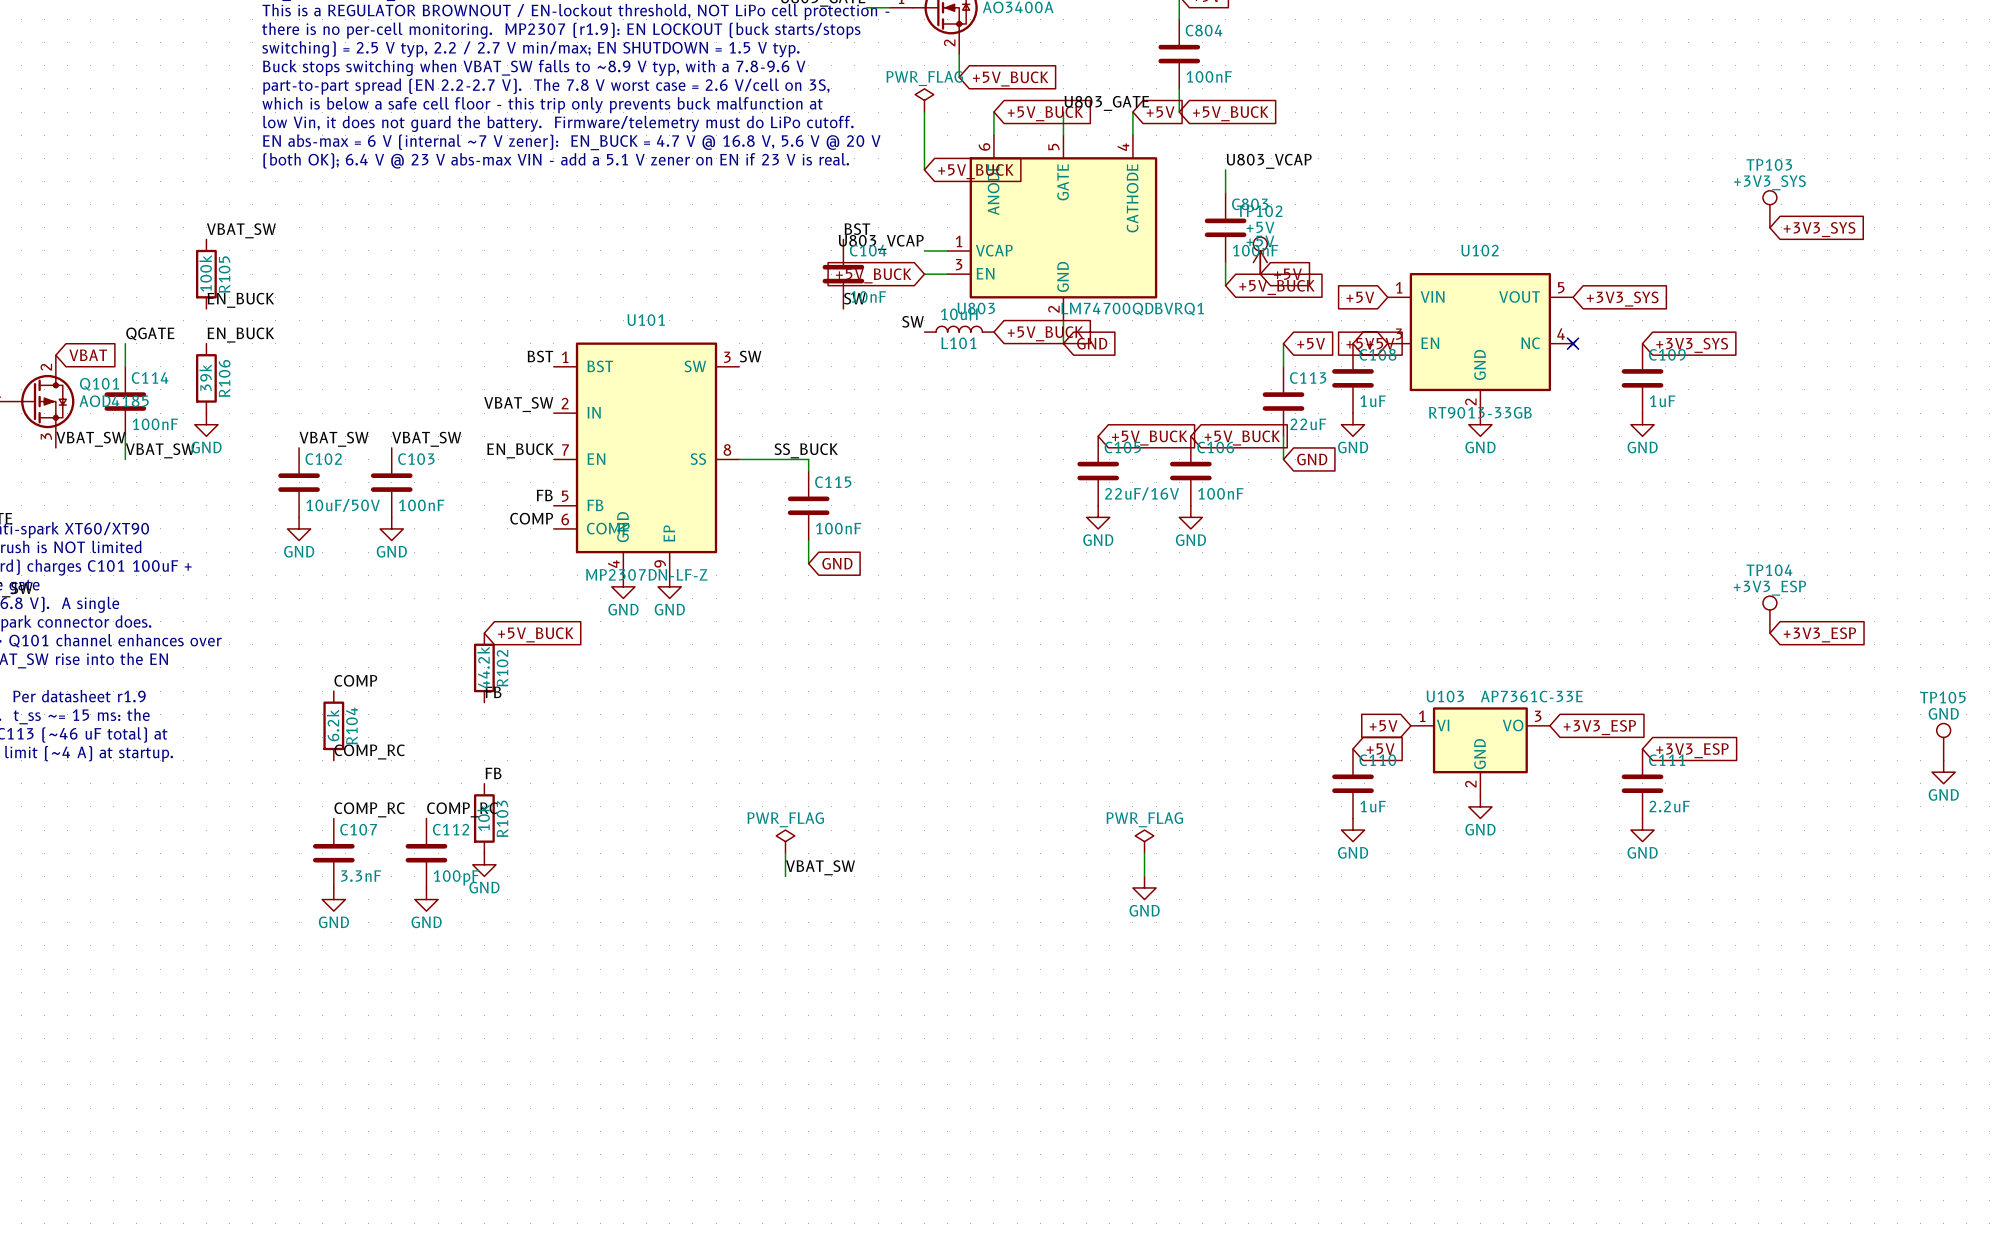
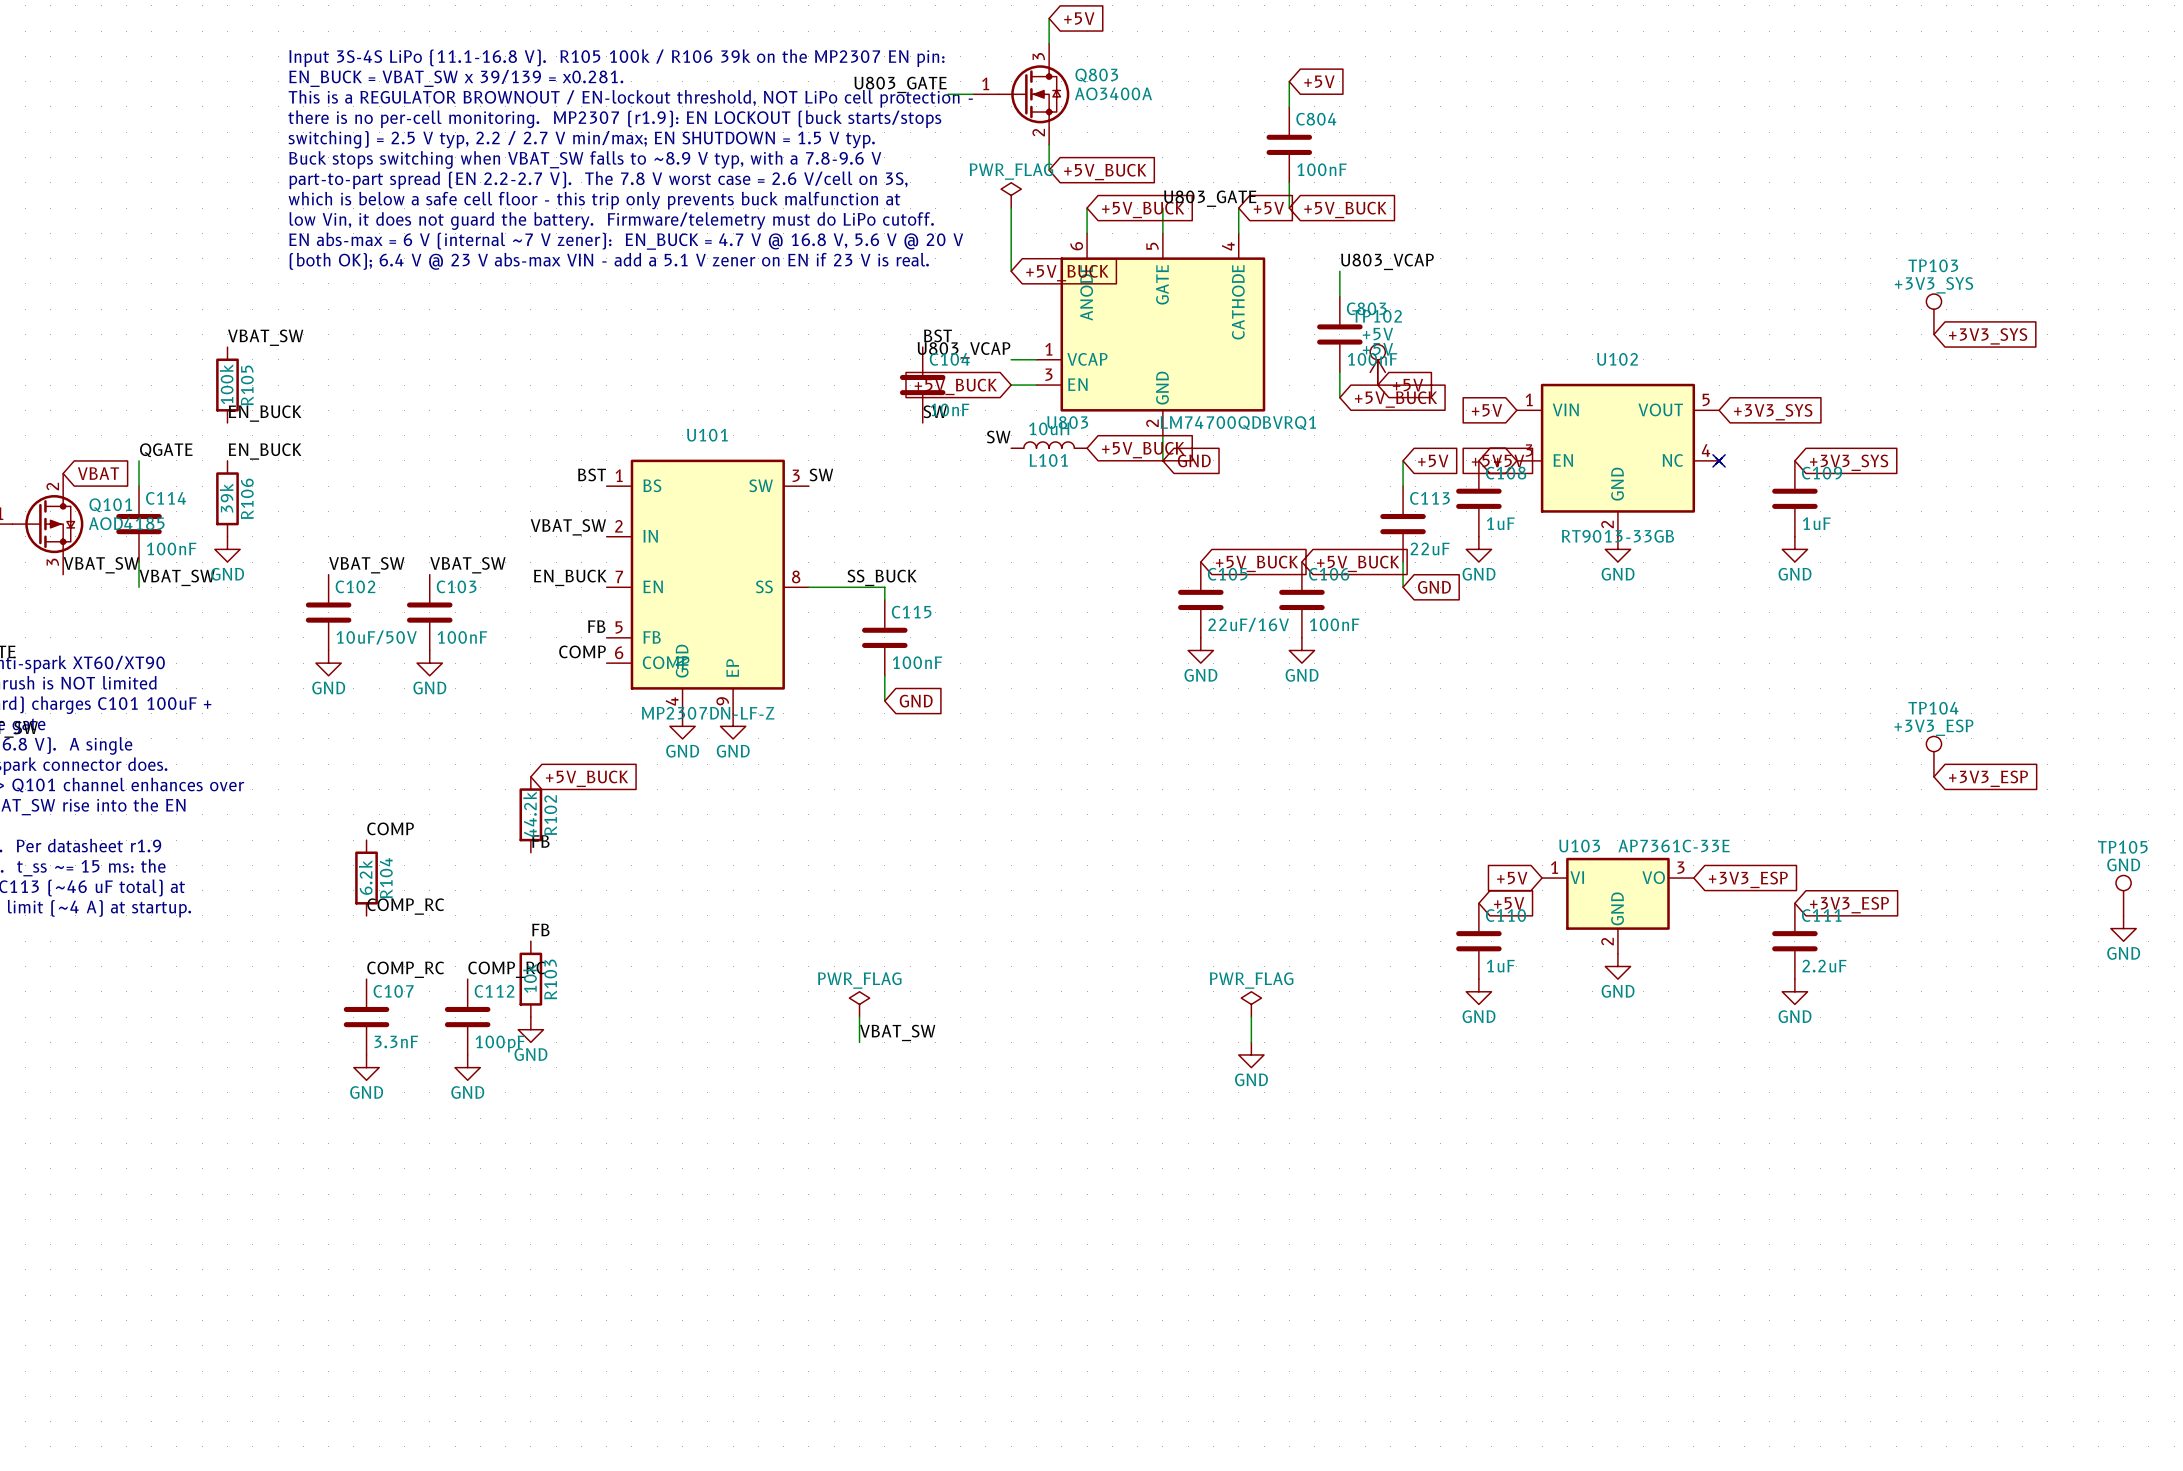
U101 pin name: BST (600, 366) -> BS (652, 485)

